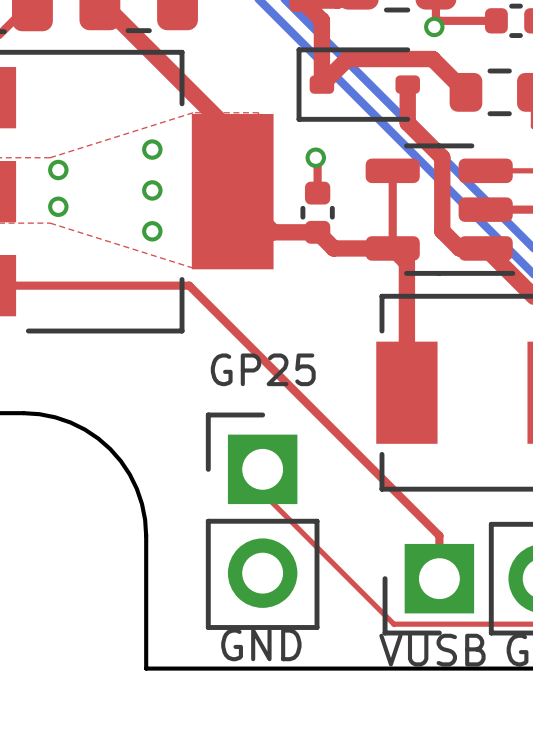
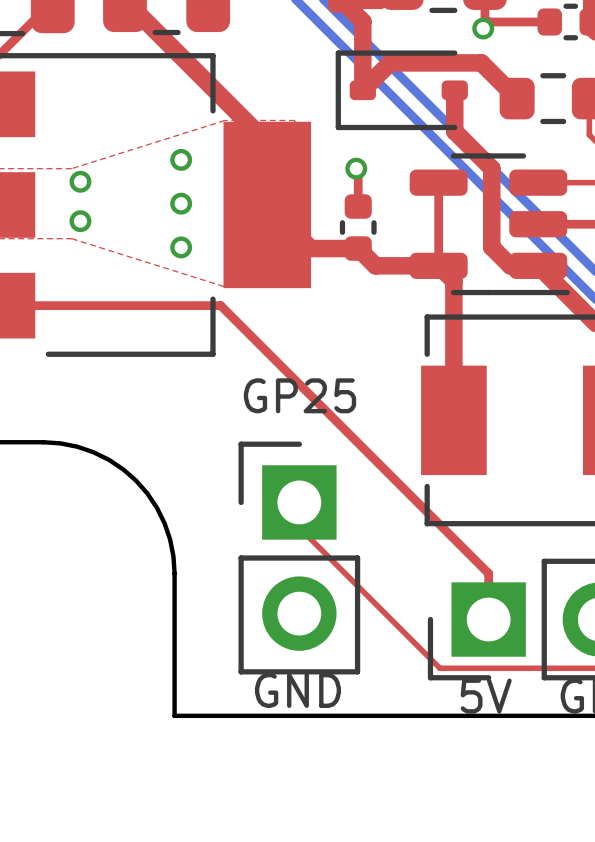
text: VUSB (432, 650) -> 5V (486, 696)

